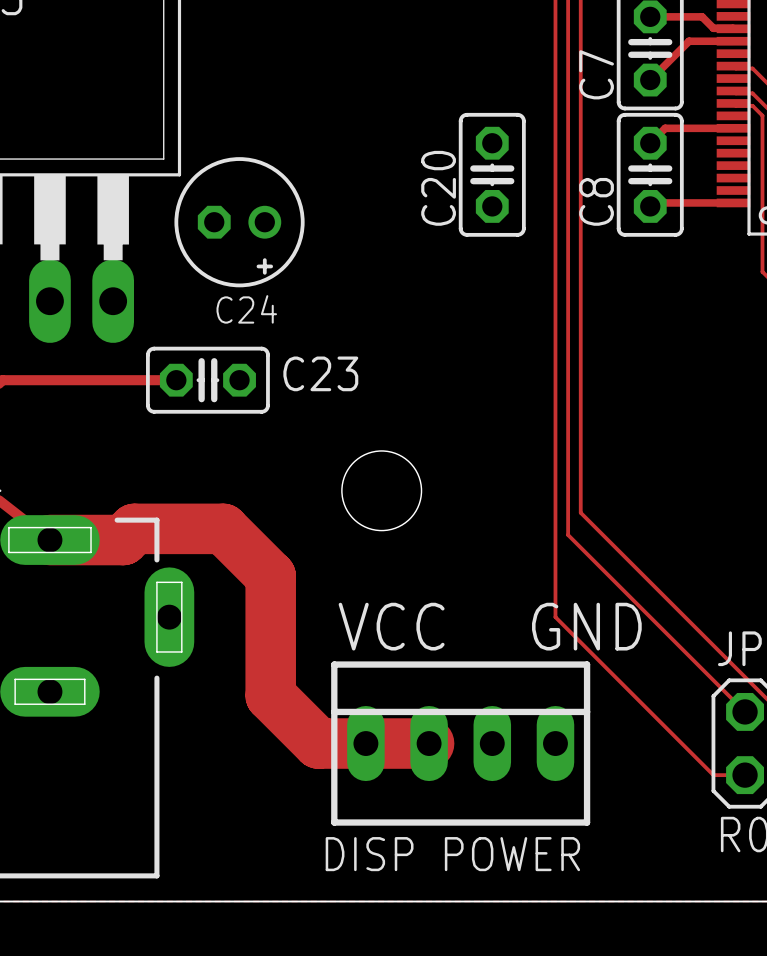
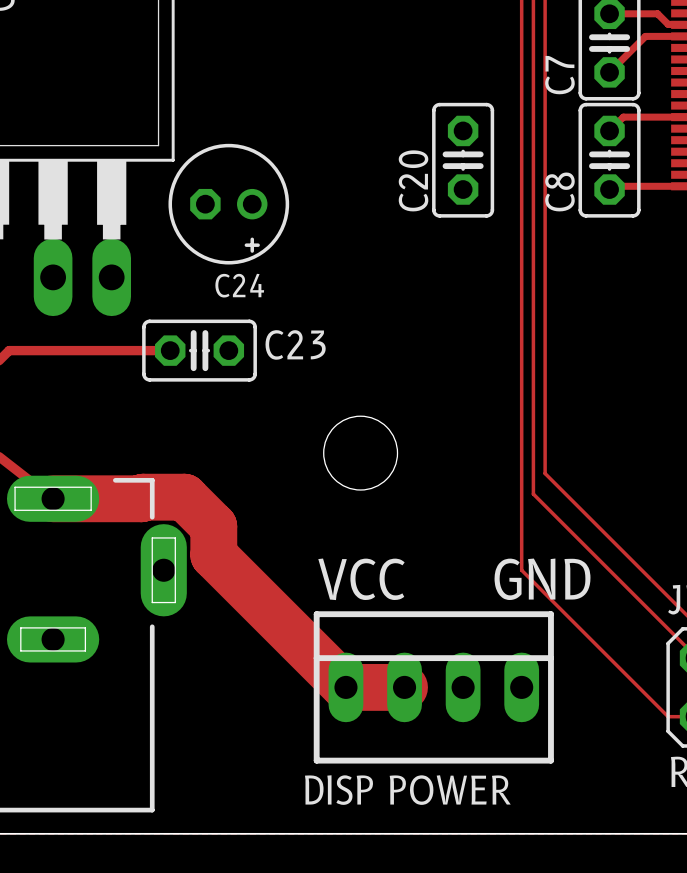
track: (123, 540) (134, 528) (223, 528) (270, 576) (270, 695) (318, 743) (365, 743) -> (121, 498) (184, 497) (213, 526) (213, 555) (345, 687)

